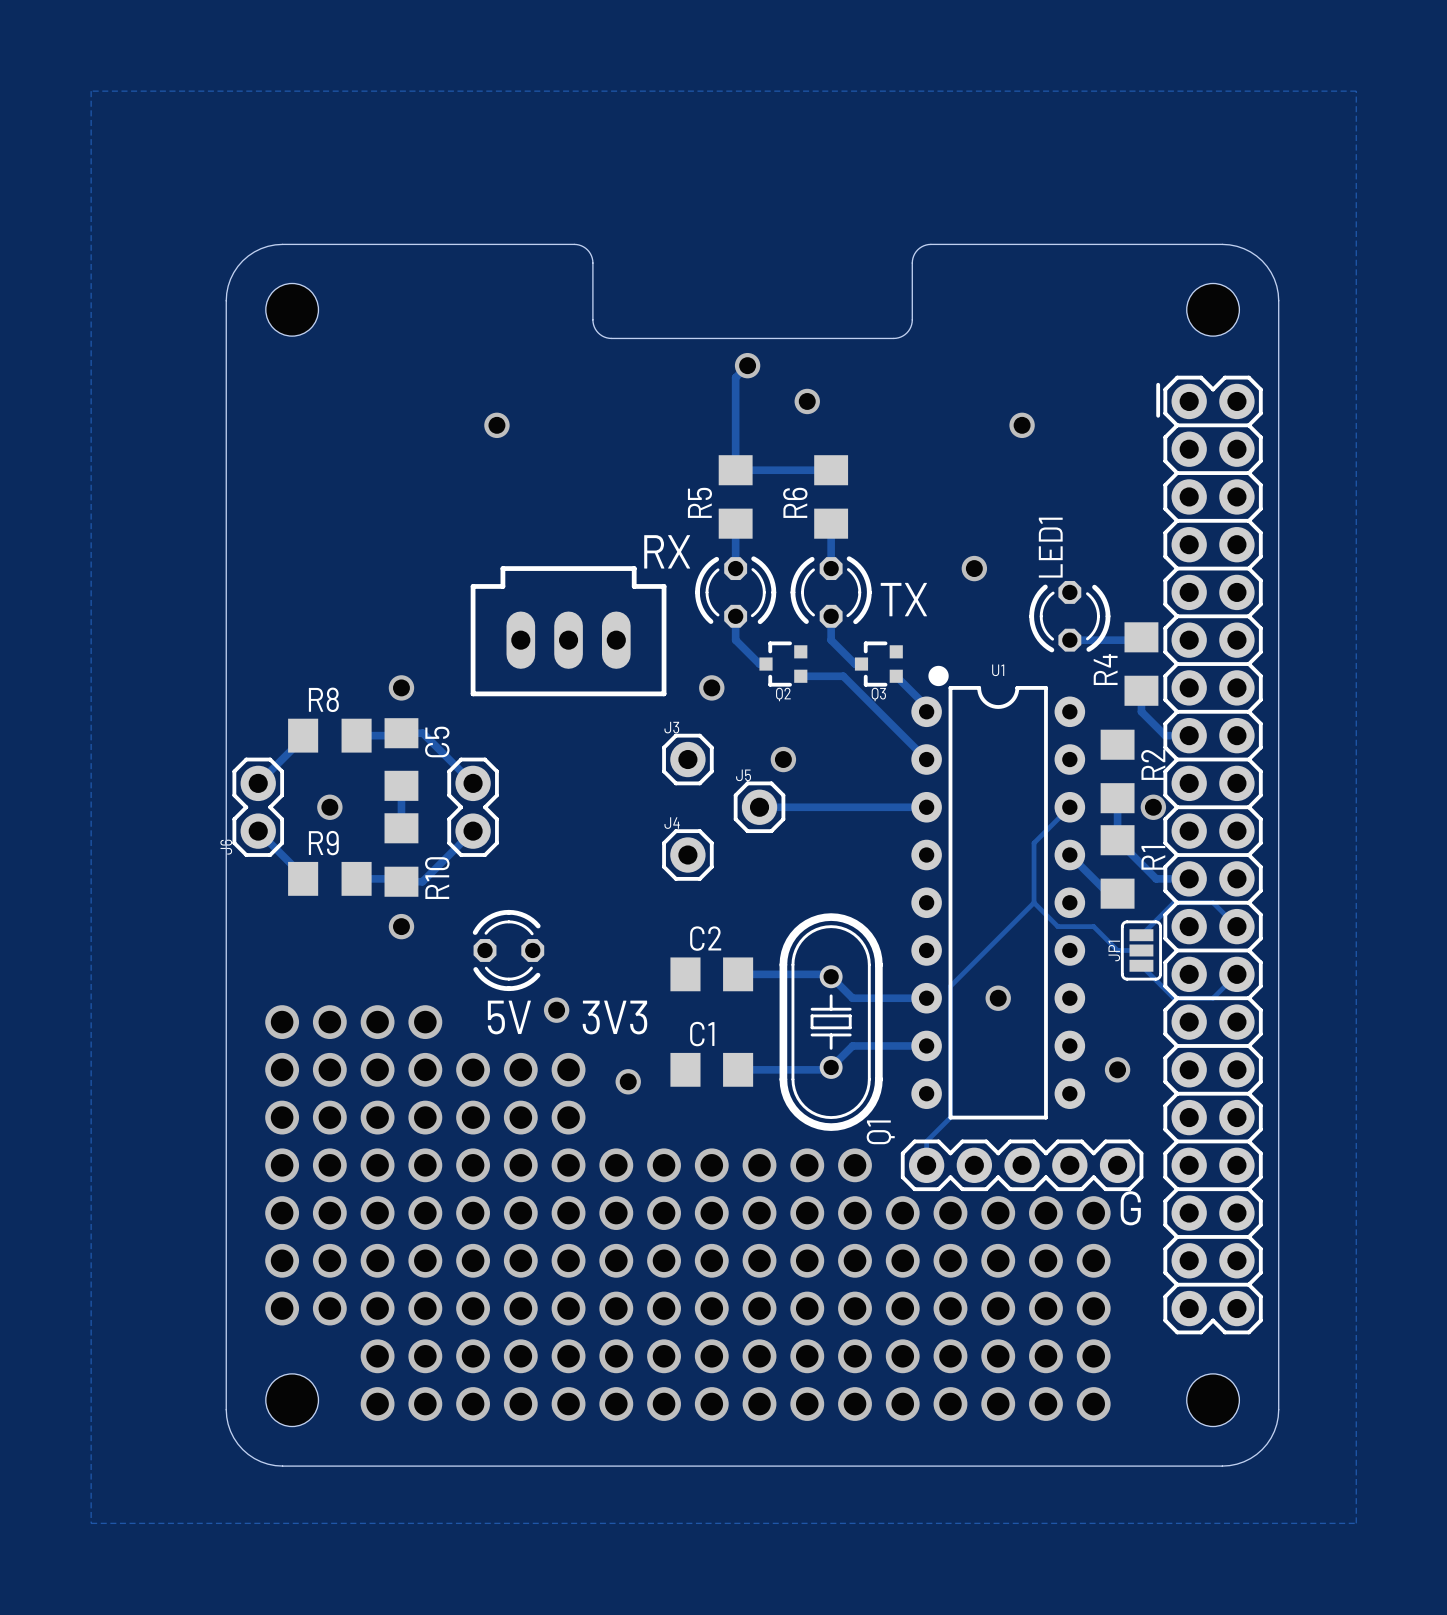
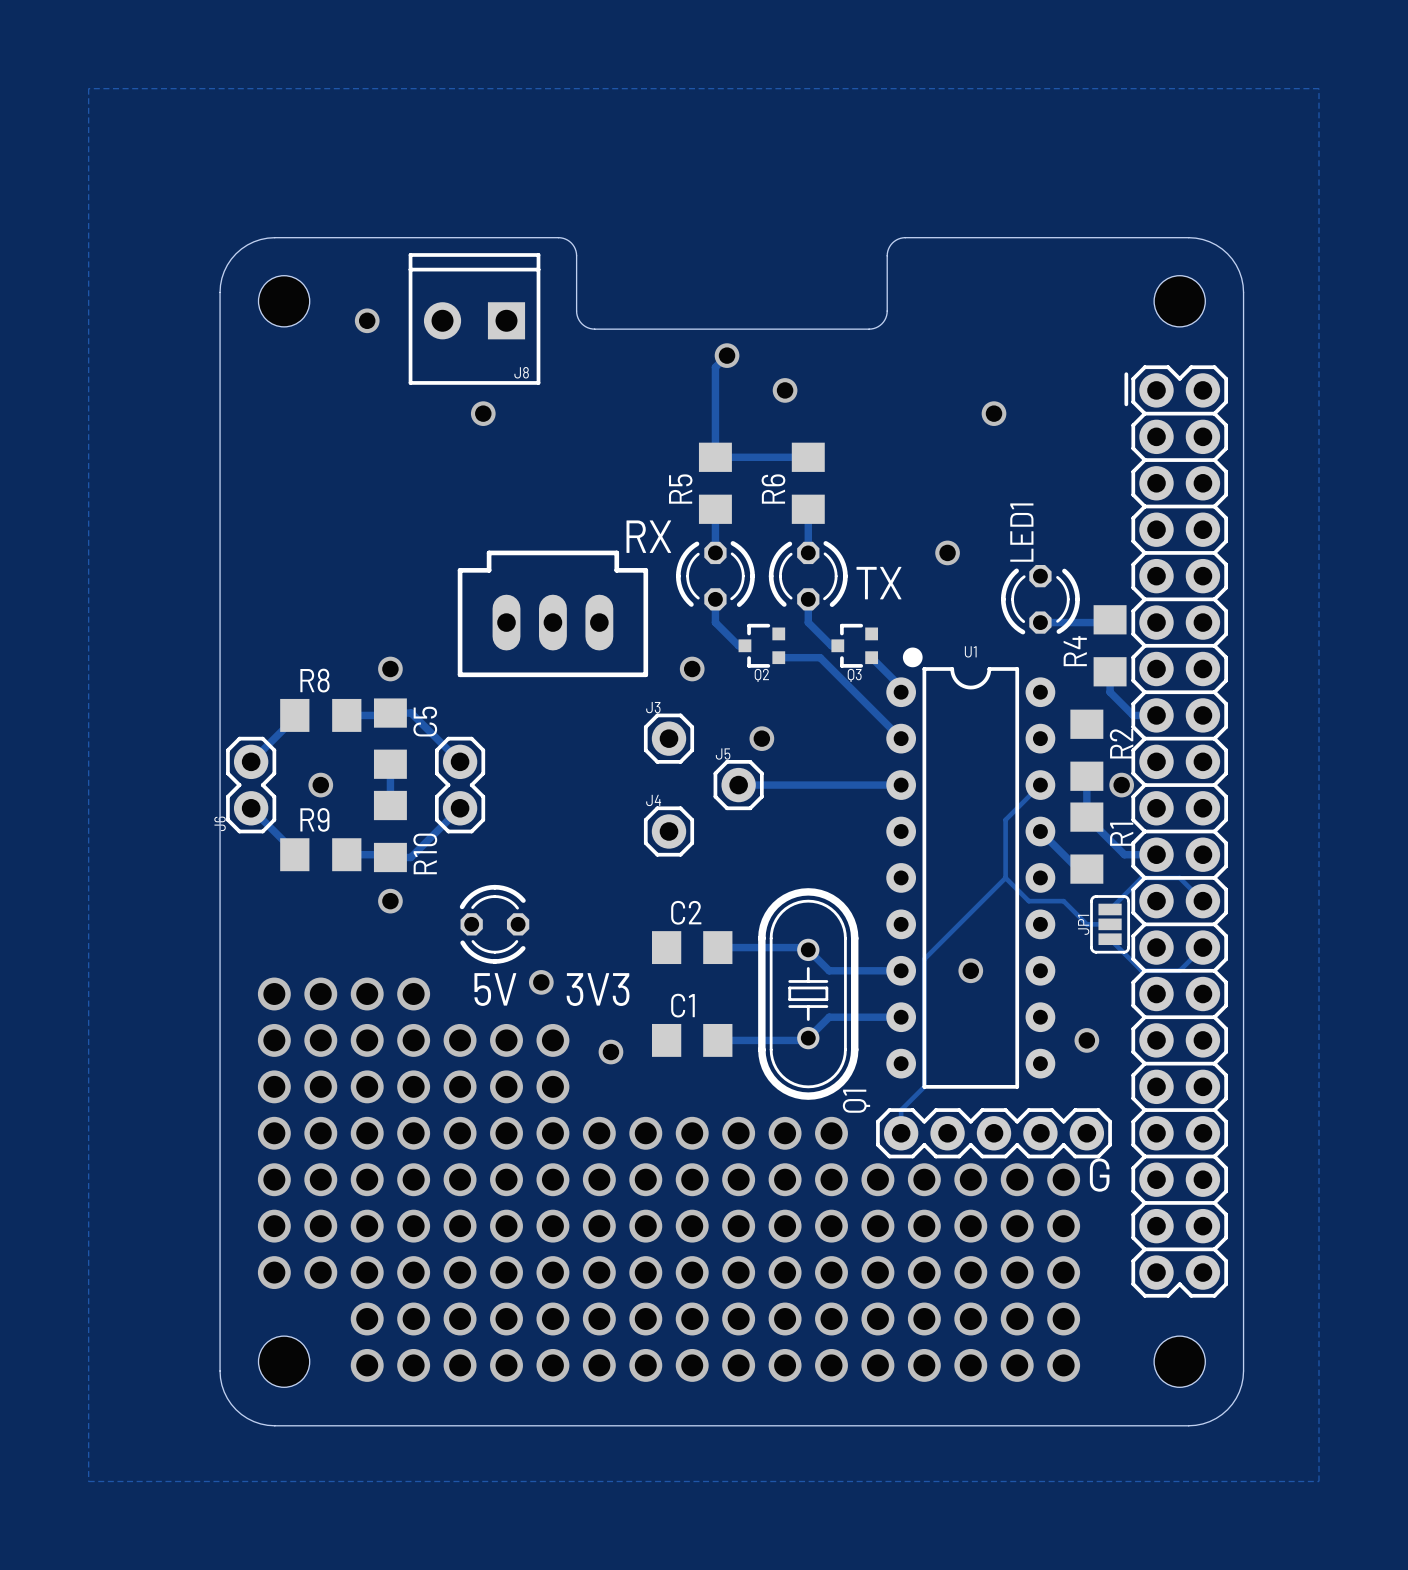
J8: none -> (474, 318)
via: none -> (367, 320)

